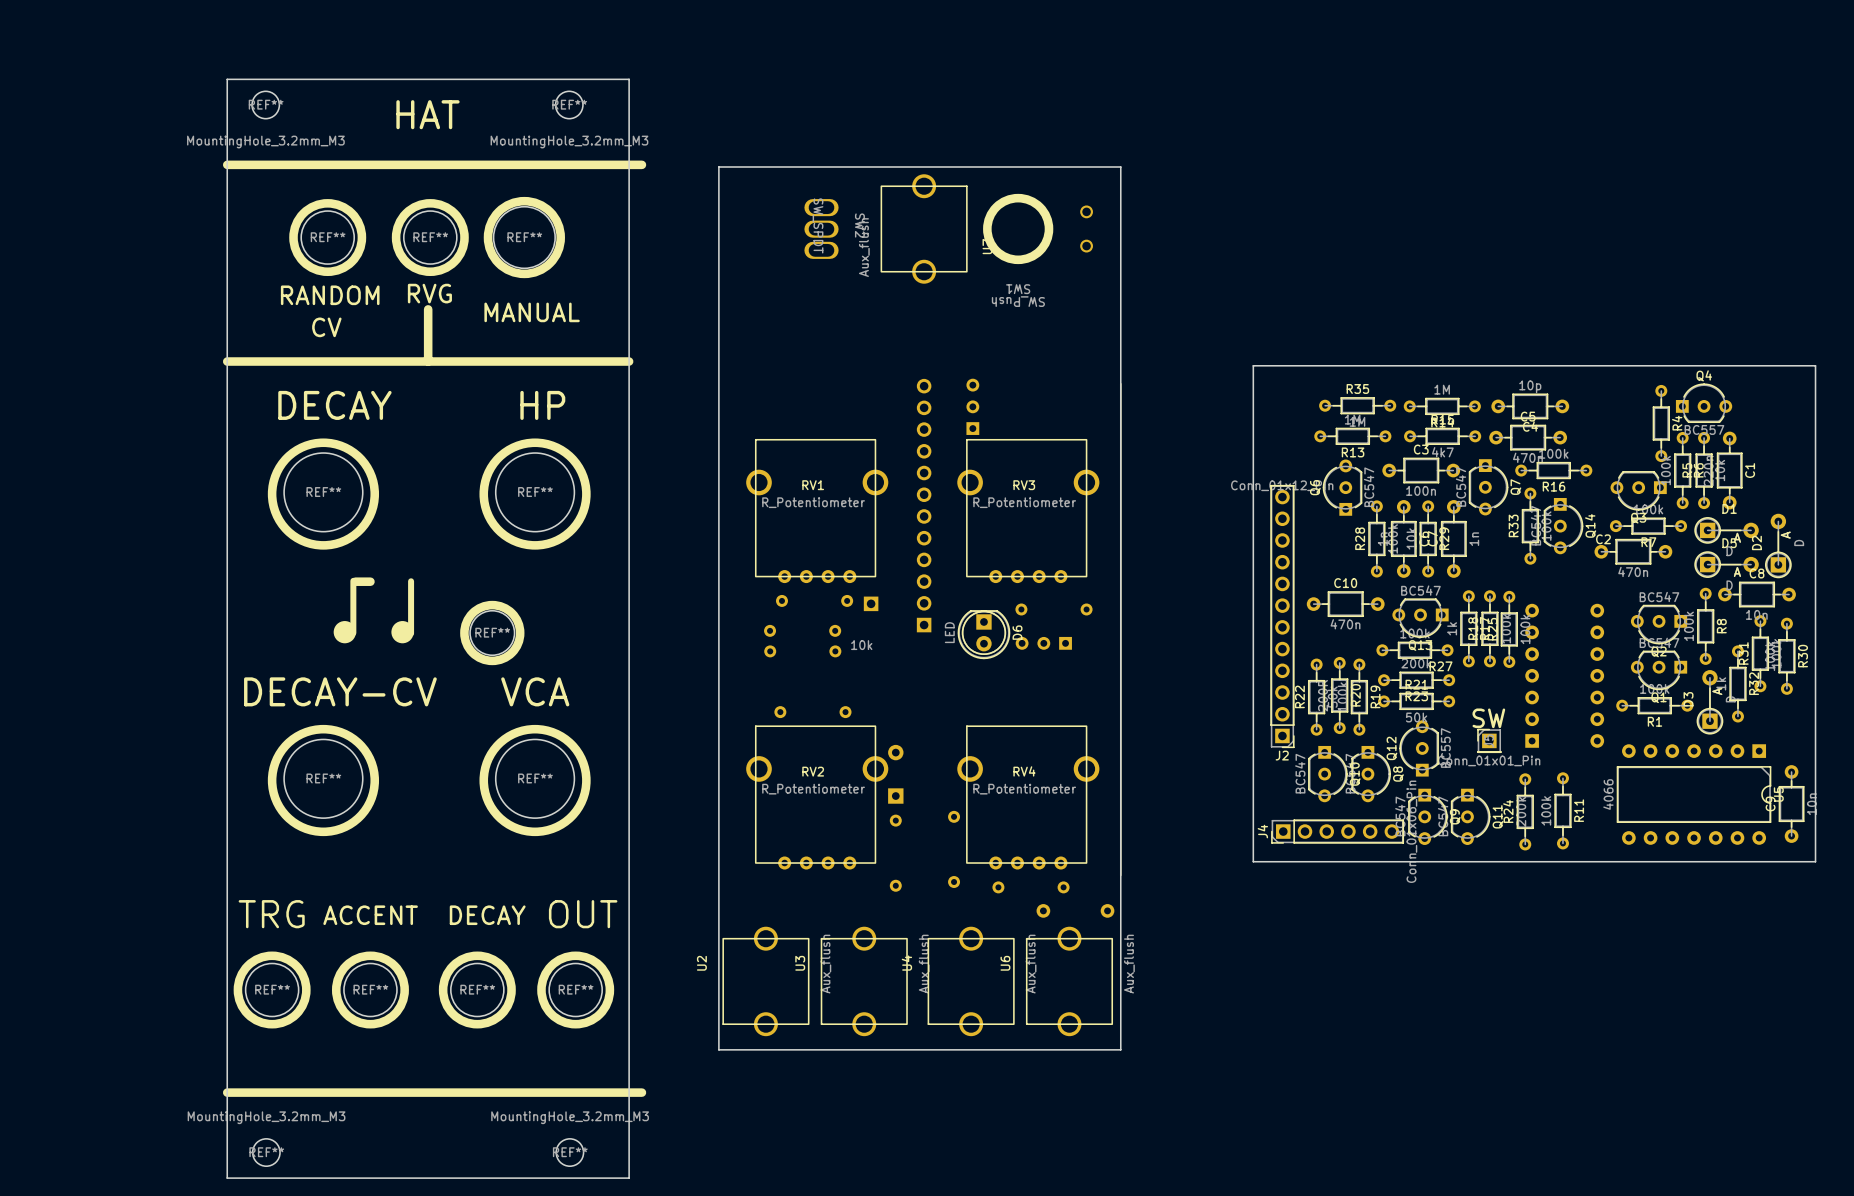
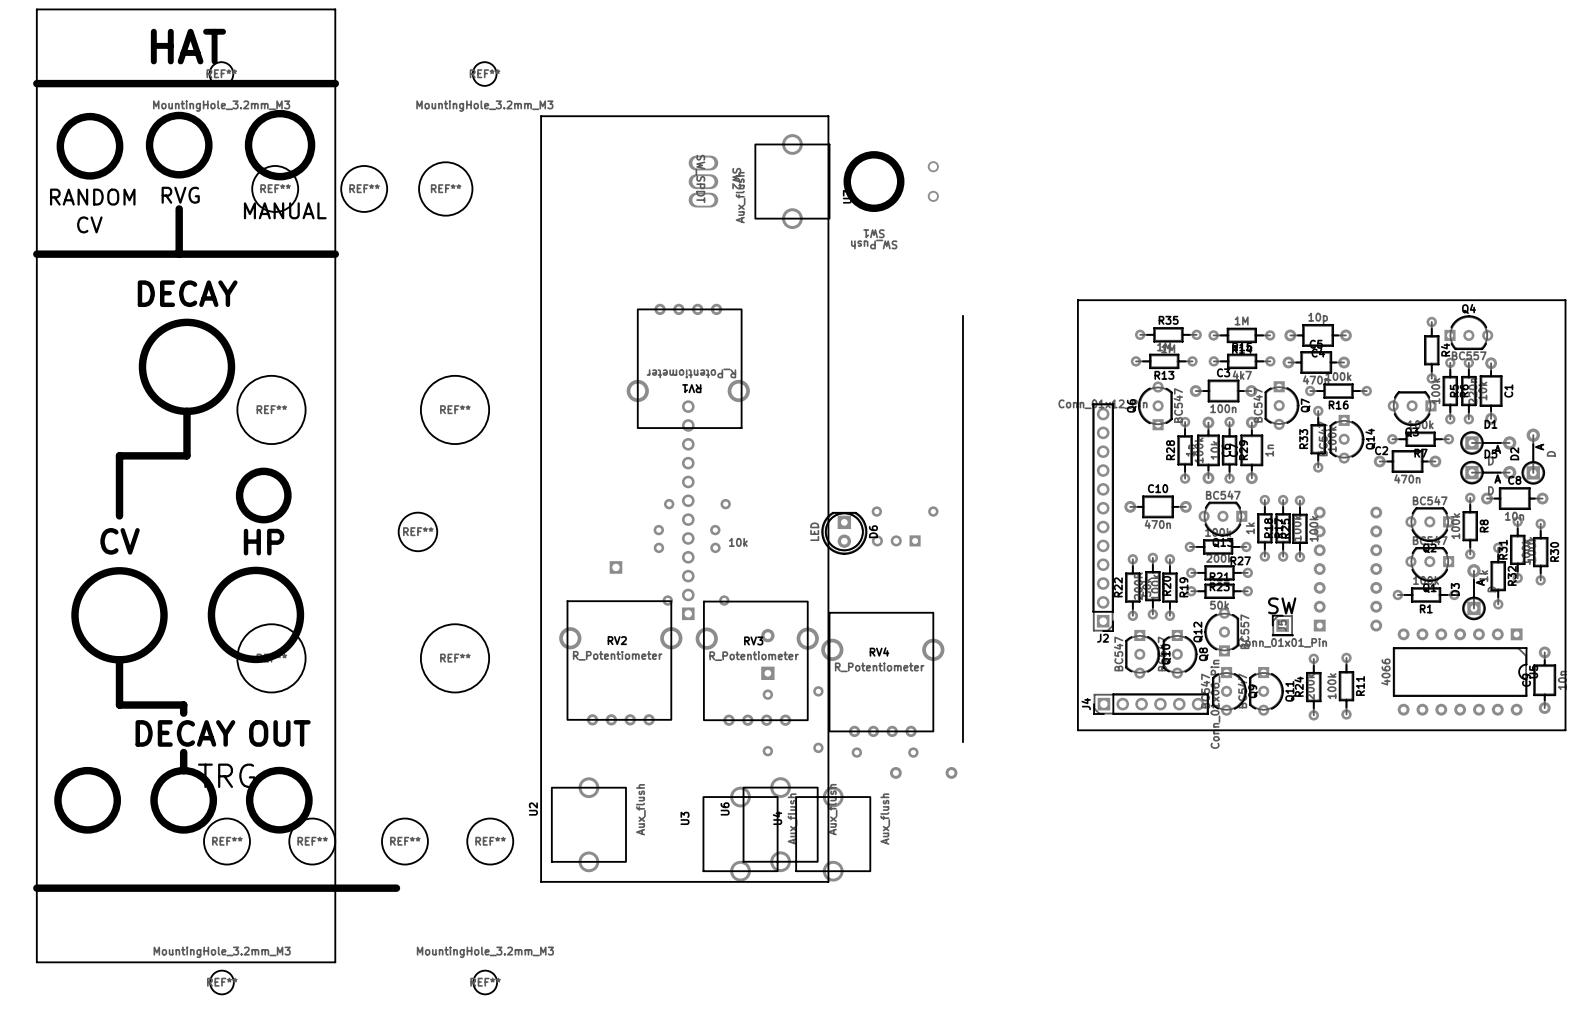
board edge: none -> (36, 9) (335, 9) (335, 962) (36, 962) (36, 9)
text: none -> HAT (188, 46)
board edge: (227, 79) (629, 79) (629, 1178) (227, 1178) (227, 79) -> none
text: HAT (427, 114) -> none
line: none -> (36, 83) (335, 83)
drawing: none -> [145, 111, 213, 179]
drawing: none -> [56, 112, 124, 180]
board edge: none -> (541, 116) (828, 116) (828, 881) (541, 881) (541, 116)
line: (227, 164) (641, 164) -> none
board edge: (718, 166) (1120, 166) (1120, 1049) (718, 1049) (718, 166) -> none
drawing: [289, 199, 367, 277] -> none
drawing: [391, 199, 469, 277] -> none
drawing position: (524, 237) -> (280, 145)
text: none -> RVG (180, 195)
text: none -> RANDOM (92, 197)
line: none -> (179, 208) (179, 254)
text: none -> CV (89, 224)
text: RVG (429, 293) -> none
text: RANDOM (330, 295) -> none
line: (428, 309) (428, 361) -> none
line: none -> (36, 254) (335, 254)
text position: MANUAL (532, 312) -> MANUAL (285, 210)
text: CV (326, 327) -> none
line: (227, 361) (629, 361) -> none
text position: DECAY (334, 405) -> DECAY (187, 293)
text: HP (542, 405) -> none
part: (972, 406) -> none
drawing: [479, 438, 591, 550] -> none
line: none -> (186, 411) (186, 455)
drawing position: (323, 494) -> (186, 366)
part position: (924, 505) -> (688, 510)
RV1 rotation: 0° (817, 511) -> 180° (688, 366)
RV3 position: (1028, 511) -> (757, 663)
line: none -> (186, 455) (119, 455) (119, 515)
line: (353, 580) (353, 633) -> none
line: (355, 581) (370, 581) -> none
line: (411, 581) (411, 633) -> none
part position: (871, 603) -> (615, 567)
drawing: [333, 621, 356, 644] -> none
drawing: [391, 621, 414, 644] -> none
drawing position: (492, 633) -> (263, 495)
text: none -> CV (120, 541)
text: none -> HP (264, 542)
drawing: none -> [71, 567, 168, 664]
text: DECAY-CV (340, 691) -> none
text: VCA (535, 691) -> none
drawing: [479, 724, 591, 837] -> none
line: none -> (119, 659) (119, 705) (183, 705) (183, 713)
drawing position: (323, 780) -> (255, 614)
RV2 position: (817, 797) -> (620, 663)
text: none -> DECAY (185, 733)
text: none -> OUT (279, 733)
line: none -> (183, 752) (183, 770)
drawing: none -> [54, 766, 121, 834]
drawing: none -> [150, 766, 218, 834]
drawing: none -> [245, 766, 313, 834]
text: OUT (583, 914) -> none
text: ACCENT (370, 915) -> none
text: DECAY (487, 915) -> none
drawing: [233, 951, 311, 1029] -> none
drawing: [331, 951, 409, 1029] -> none
drawing: [438, 951, 516, 1029] -> none
drawing: [537, 951, 615, 1029] -> none
U2 position: (765, 981) -> (588, 824)
U6 position: (1069, 981) -> (780, 824)
line: (227, 1092) (641, 1092) -> (36, 888) (396, 888)

